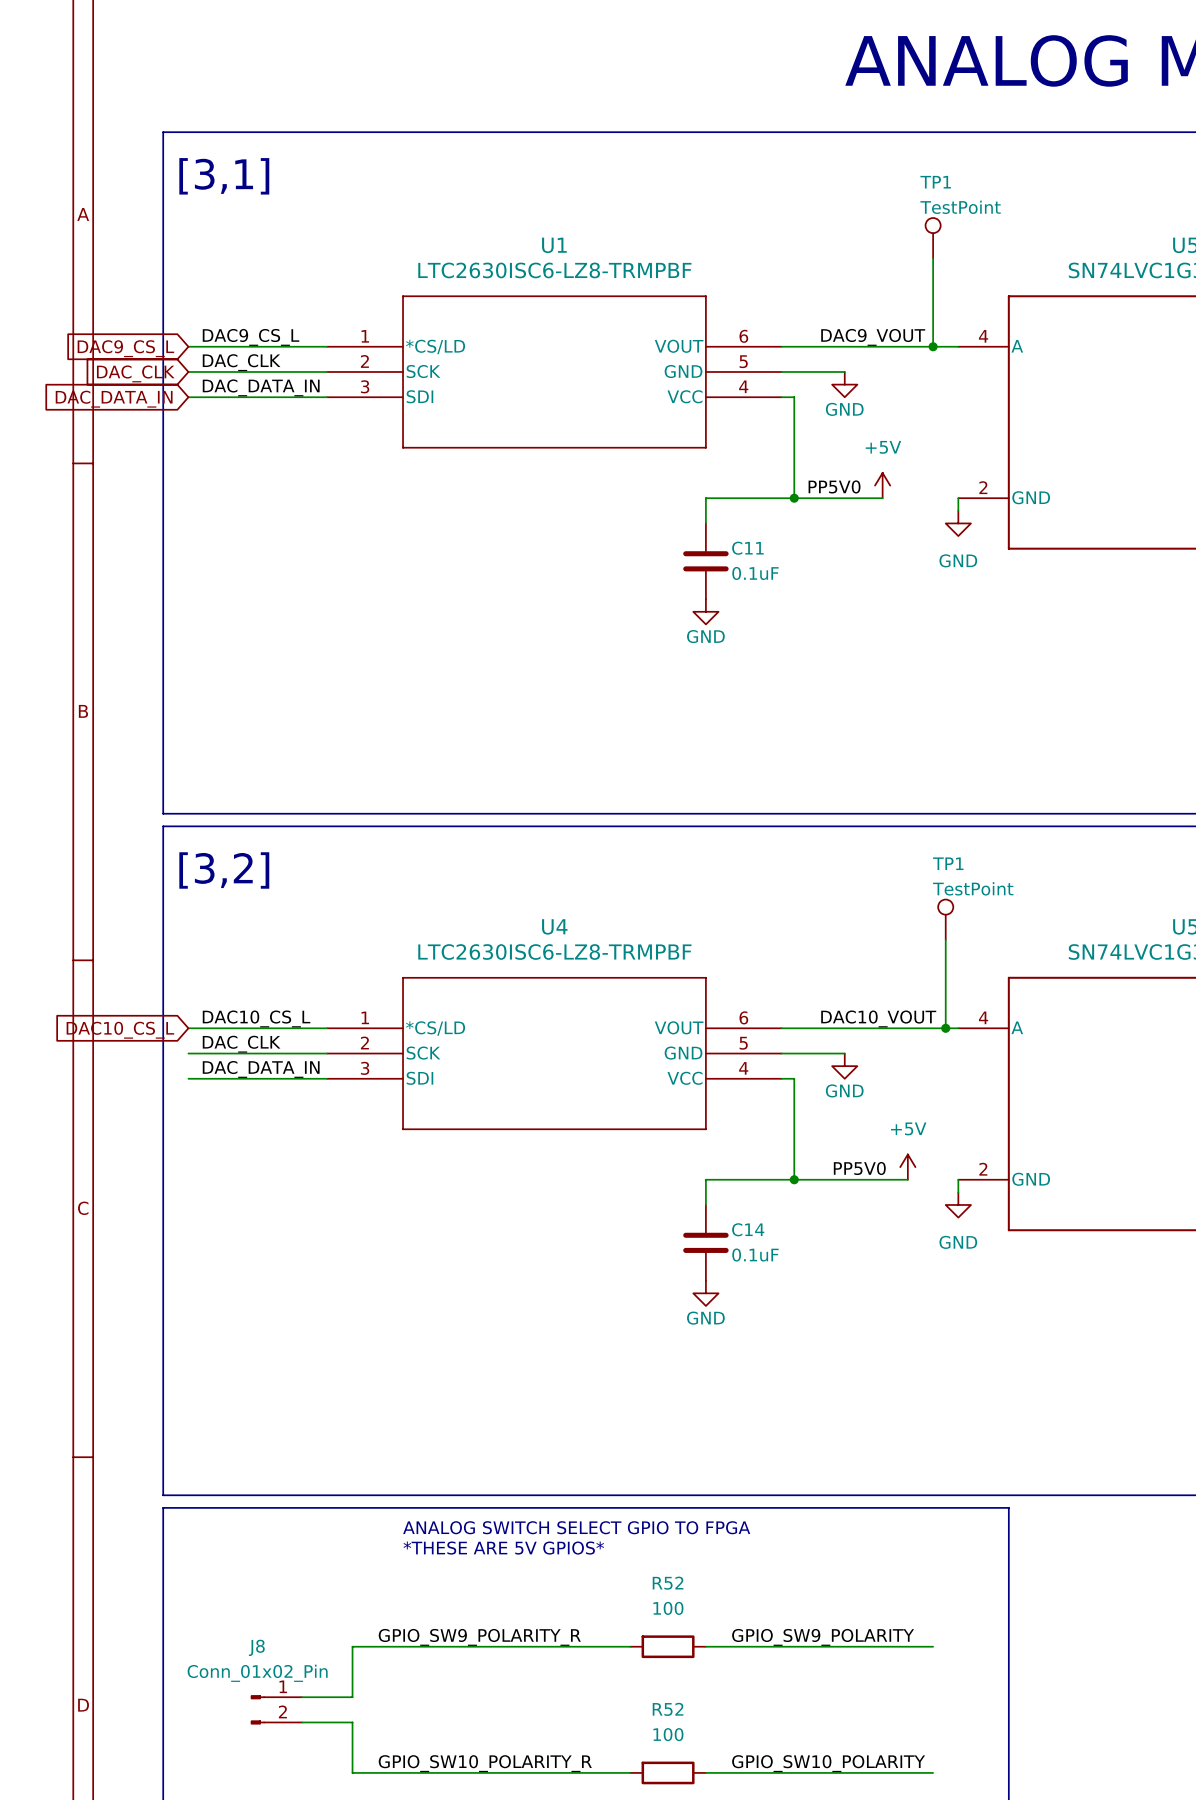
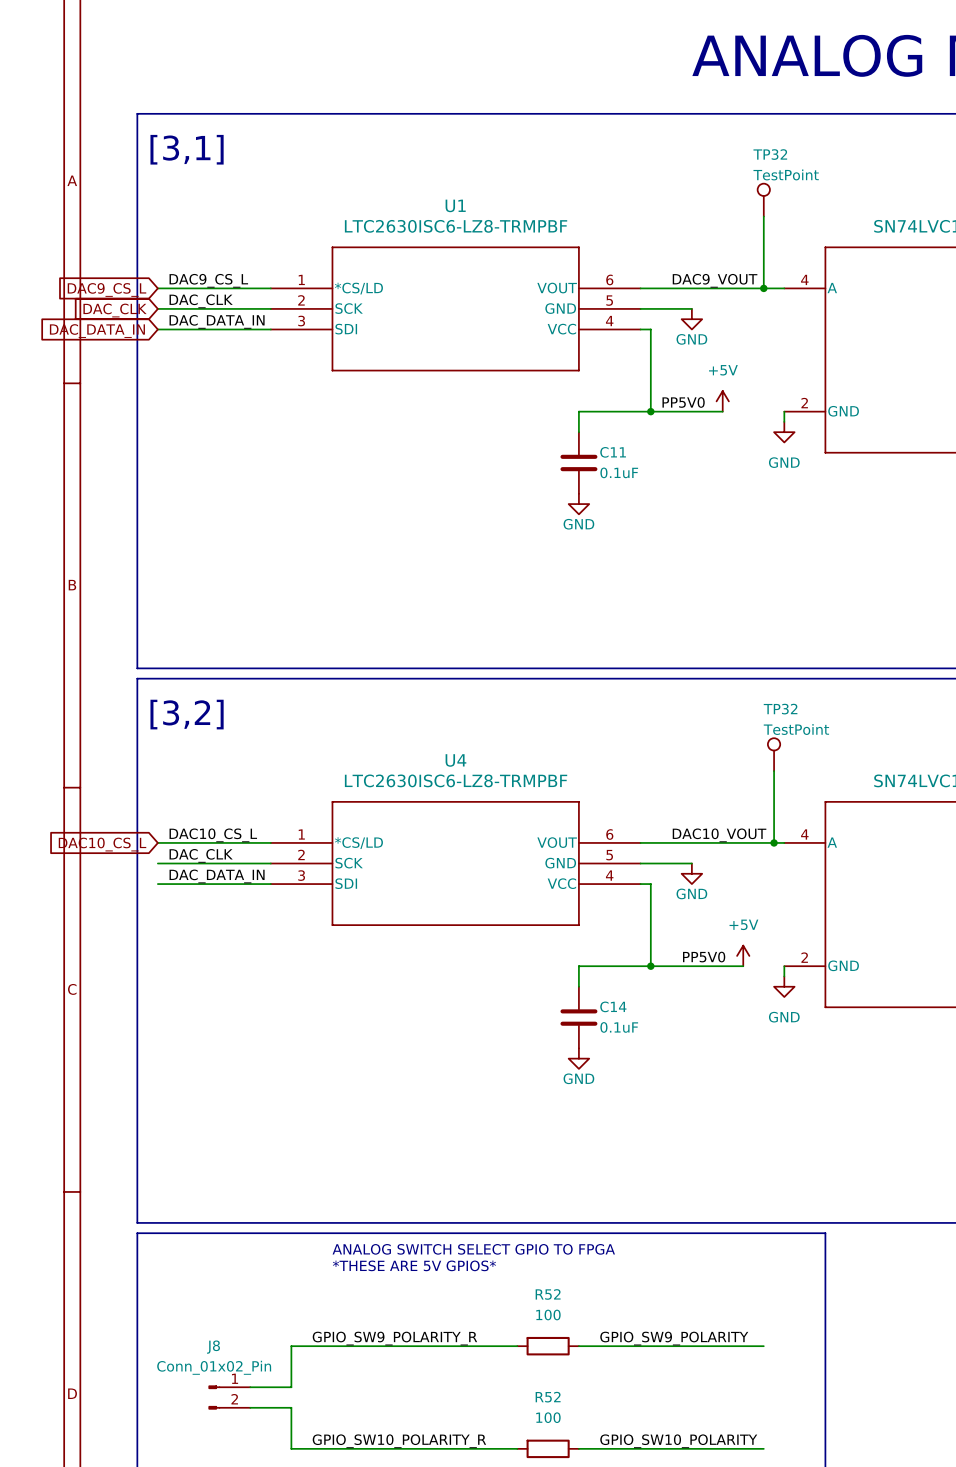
TP1 name: TP1 (935, 182) -> TP32 (770, 154)
TP1 name: TP1 (948, 863) -> TP32 (780, 709)

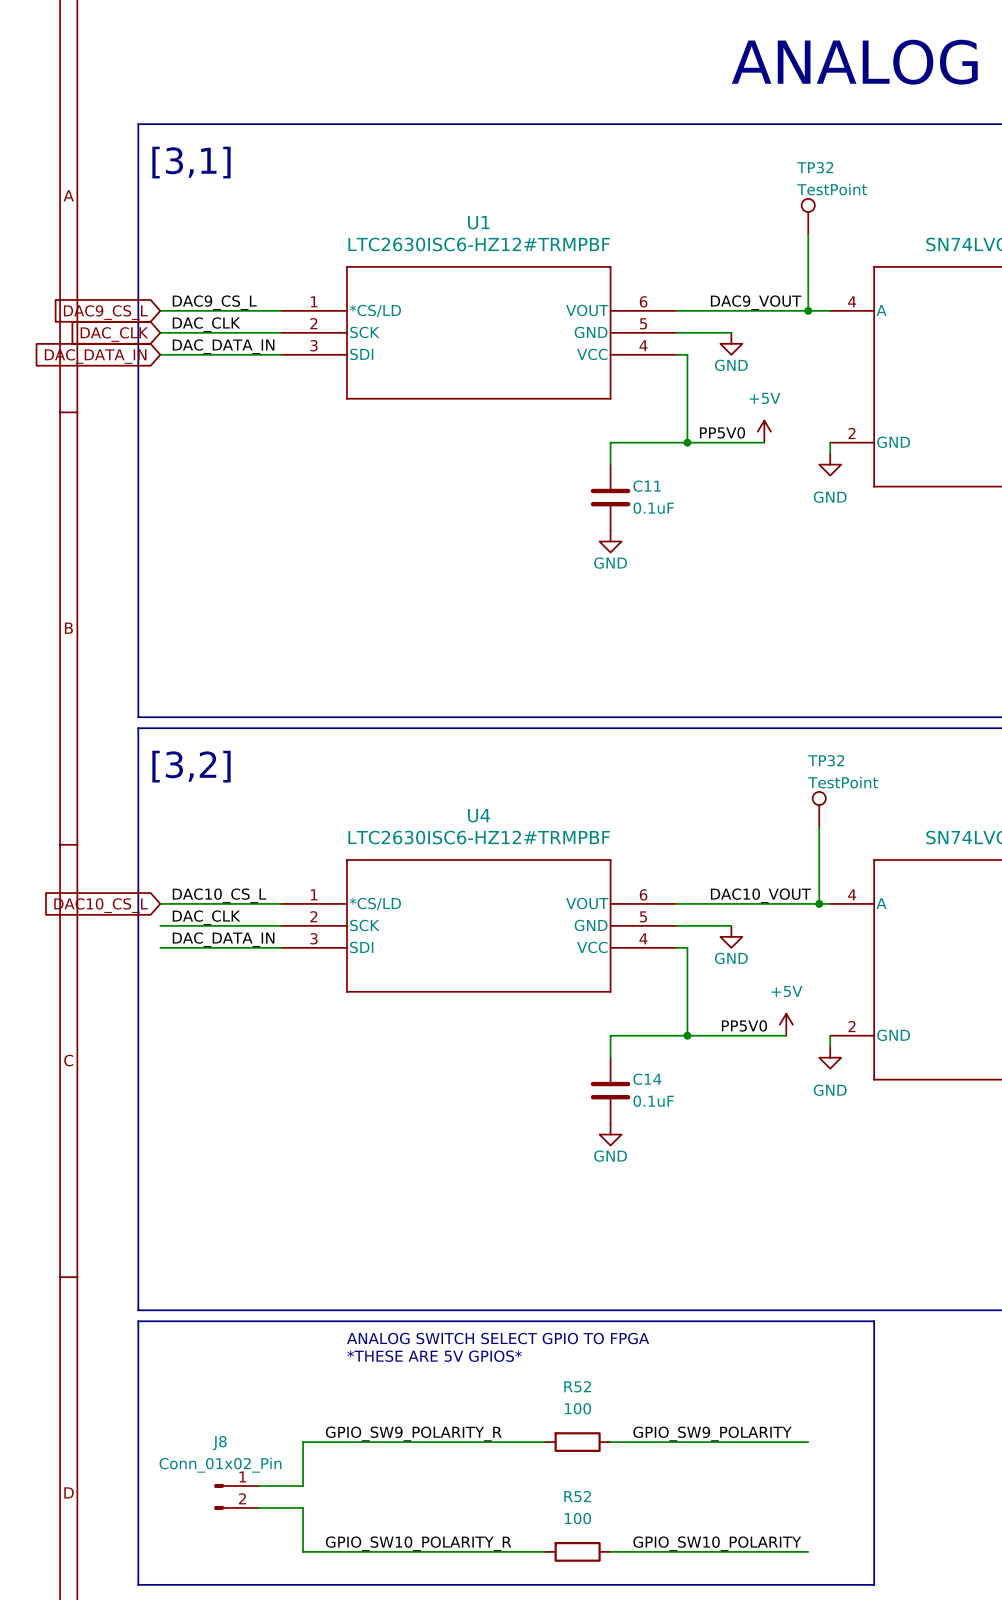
U1 value: LTC2630ISC6-LZ8-TRMPBF (456, 226) -> LTC2630ISC6-HZ12#TRMPBF (479, 244)
U4 value: LTC2630ISC6-LZ8-TRMPBF (456, 780) -> LTC2630ISC6-HZ12#TRMPBF (479, 837)

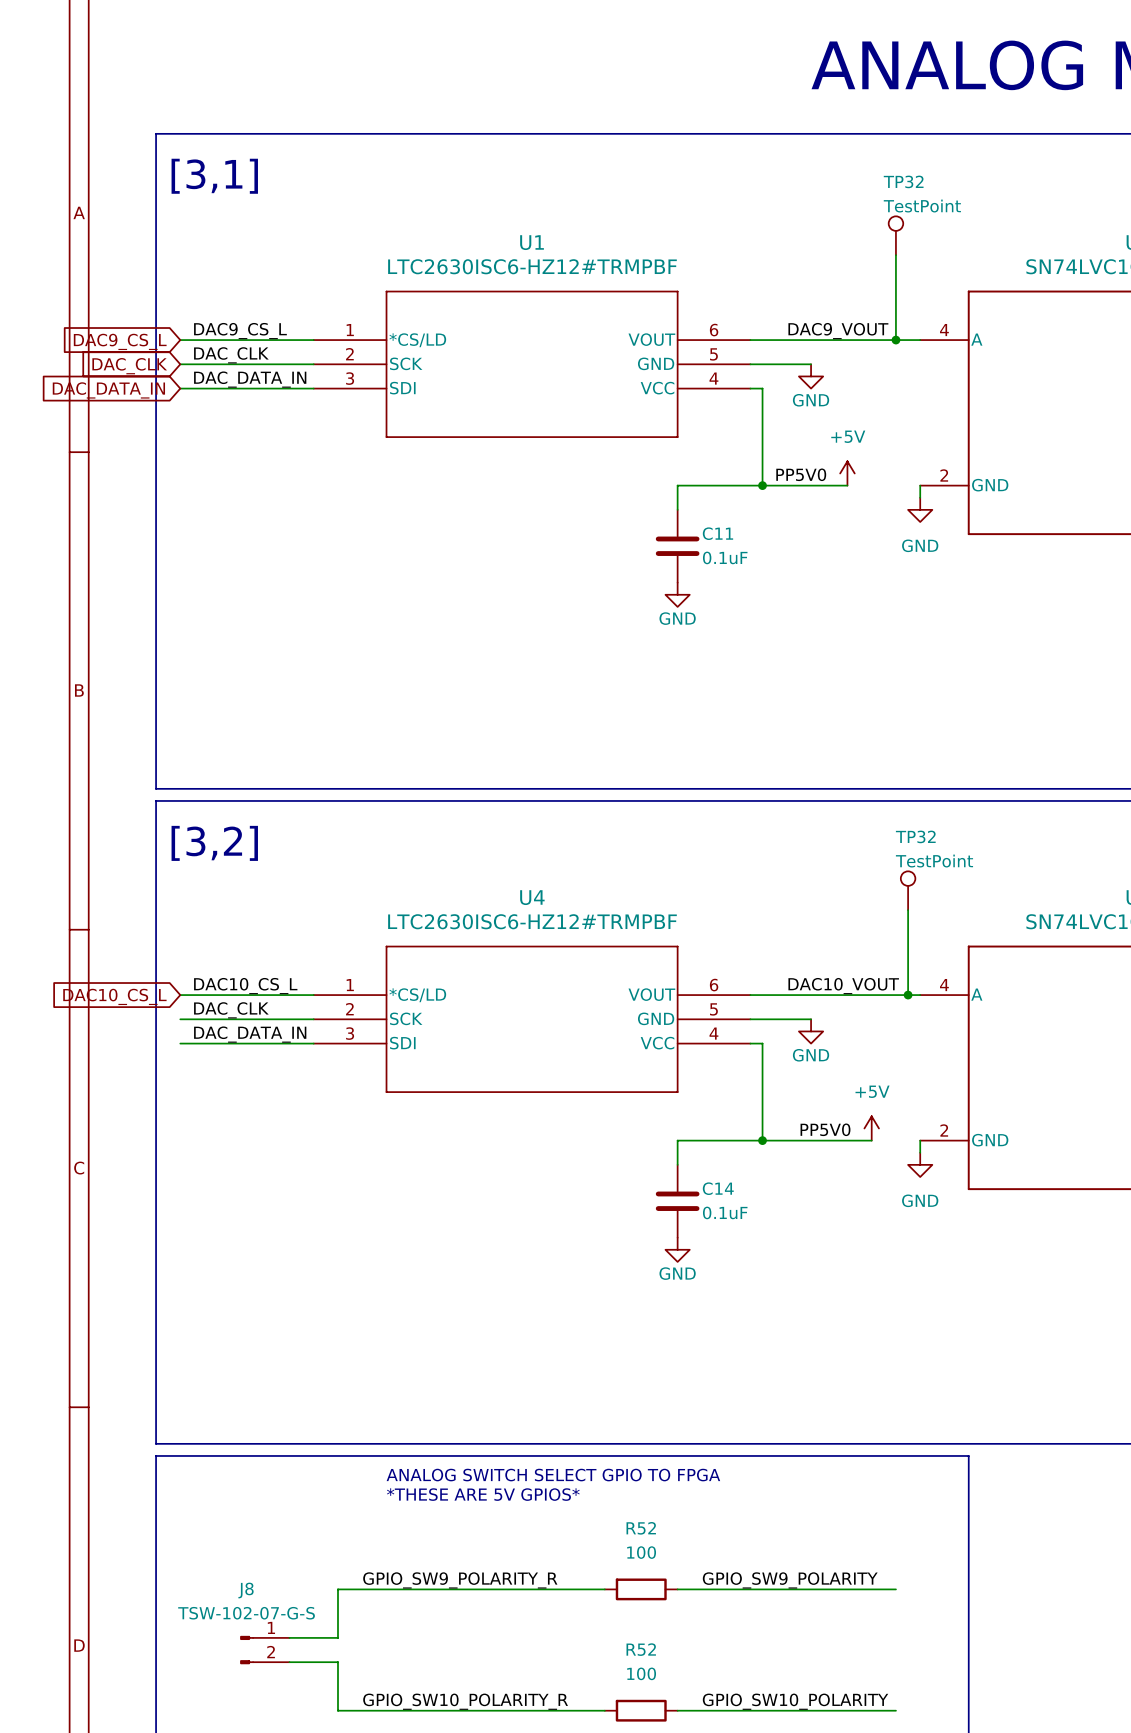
J8 value: Conn_01x02_Pin (220, 1465) -> TSW-102-07-G-S (246, 1613)

